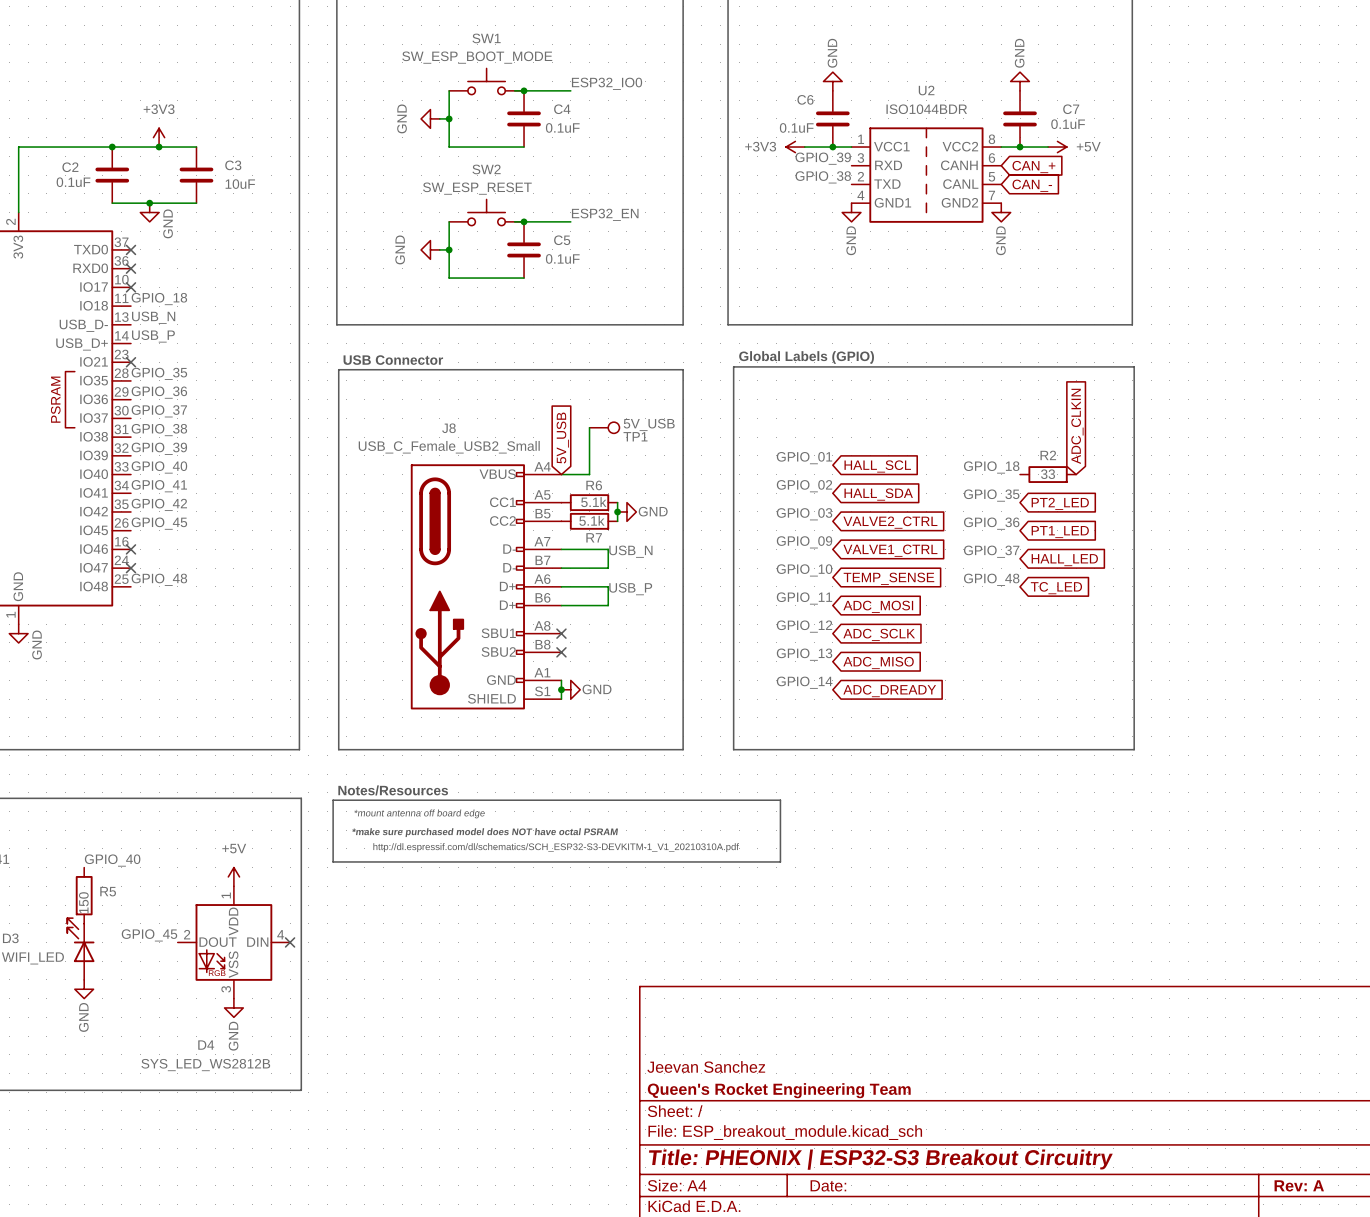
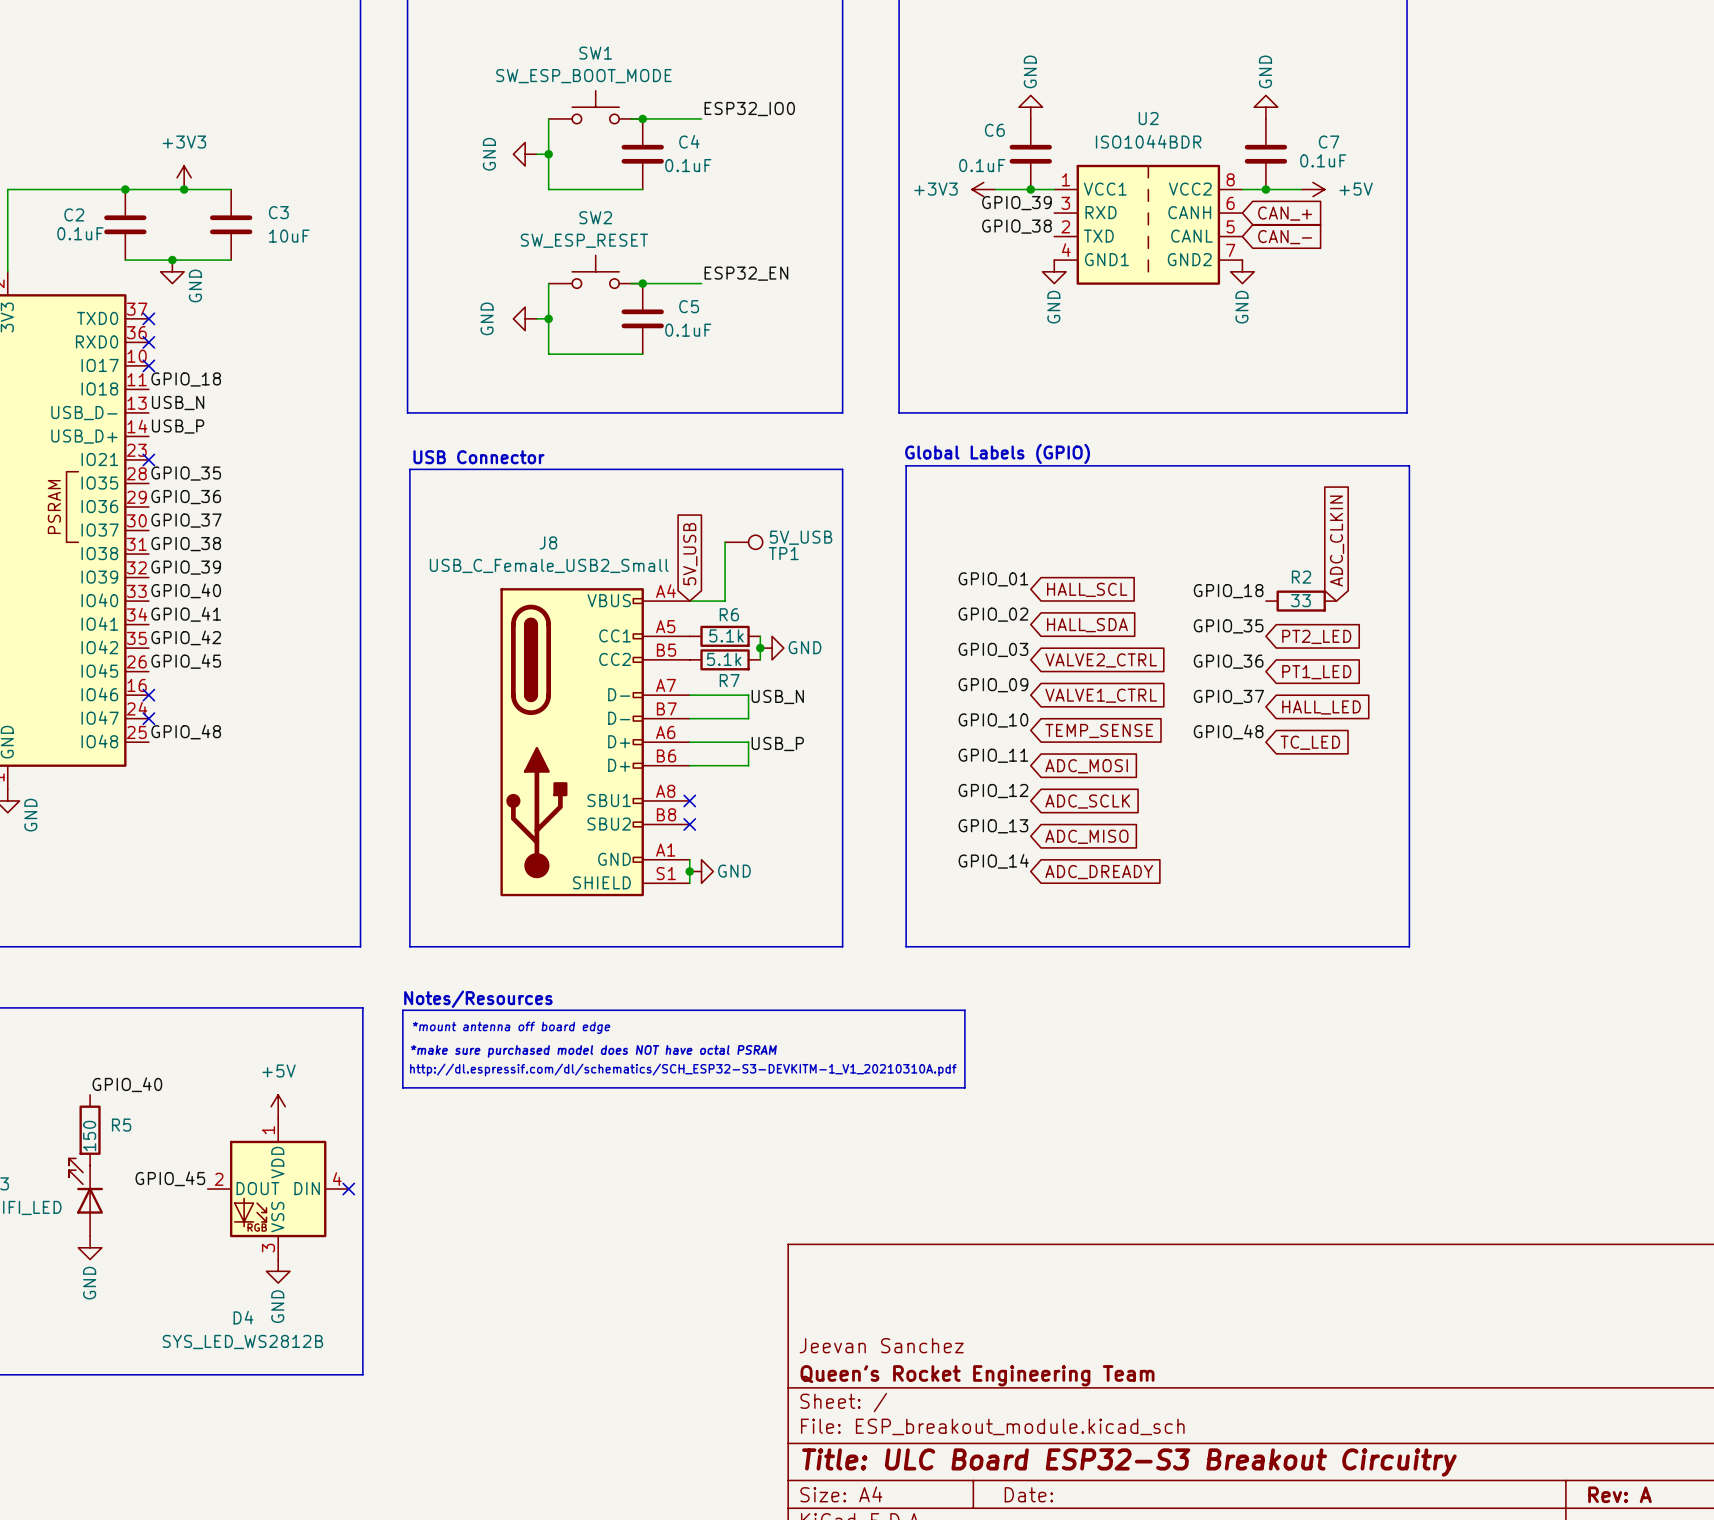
title block: Title: PHEONIX | ESP32-S3 Breakout Circuitry (880, 1159) -> Title: ULC Board ESP32-S3 Breakout Circuitry (1129, 1462)

